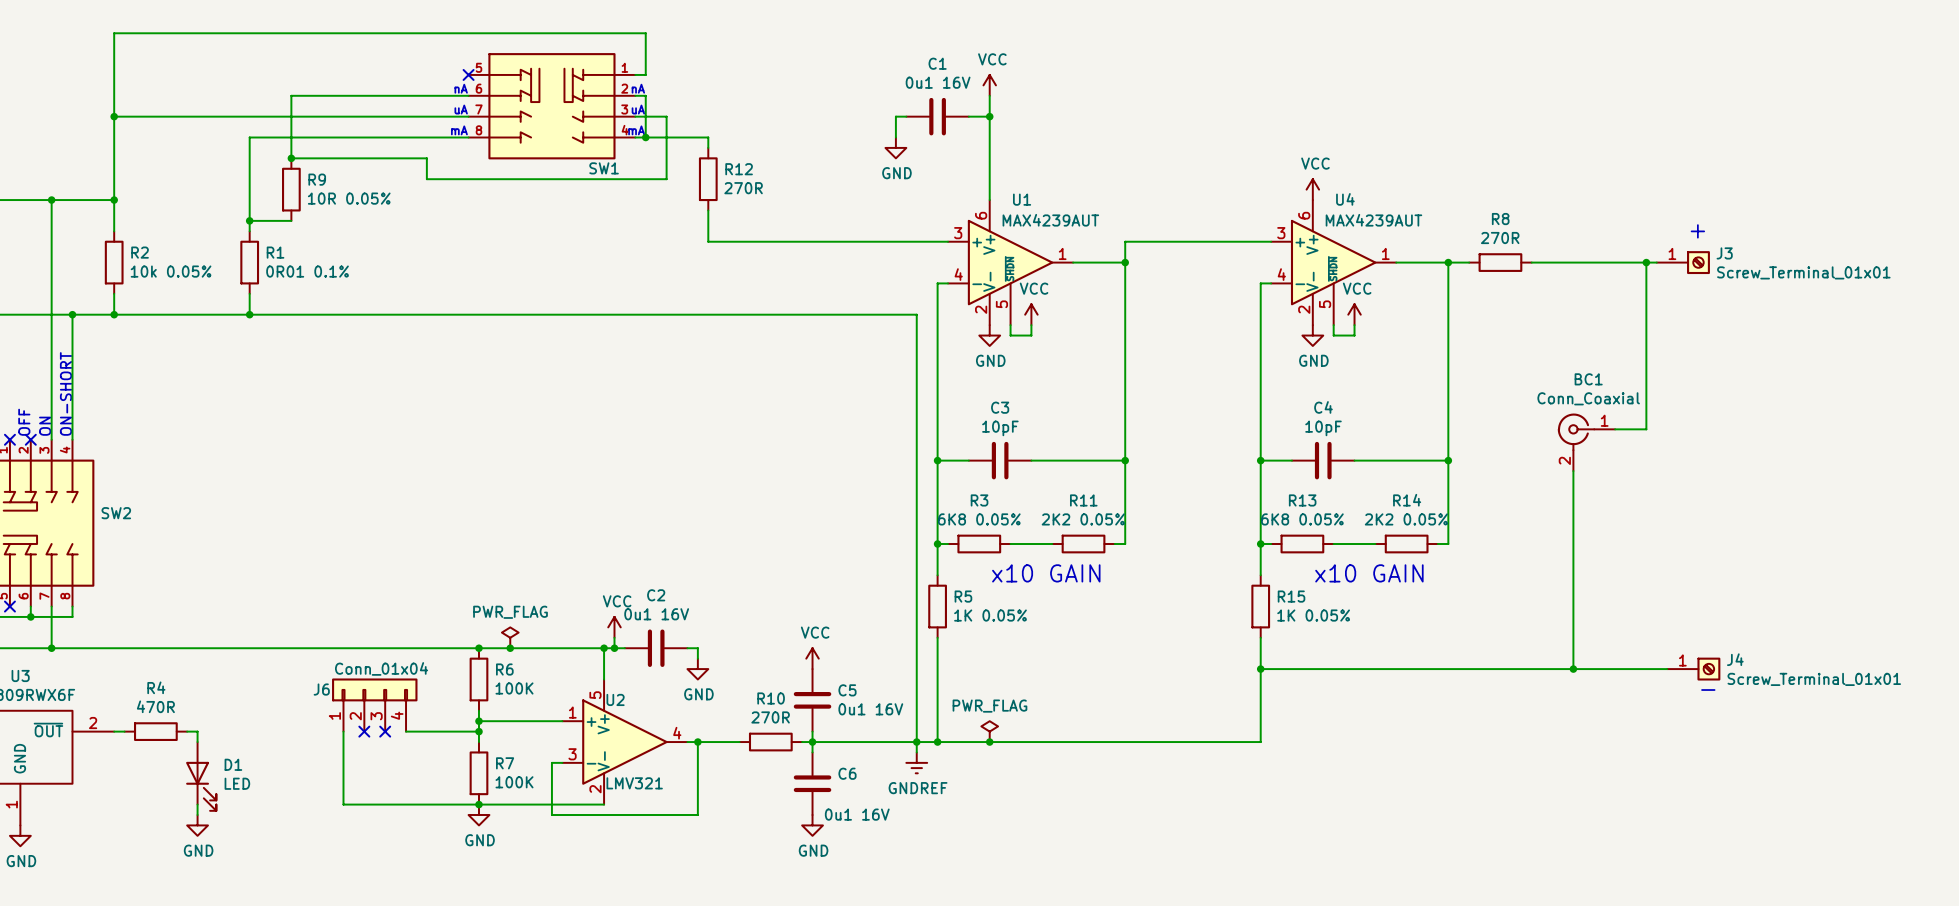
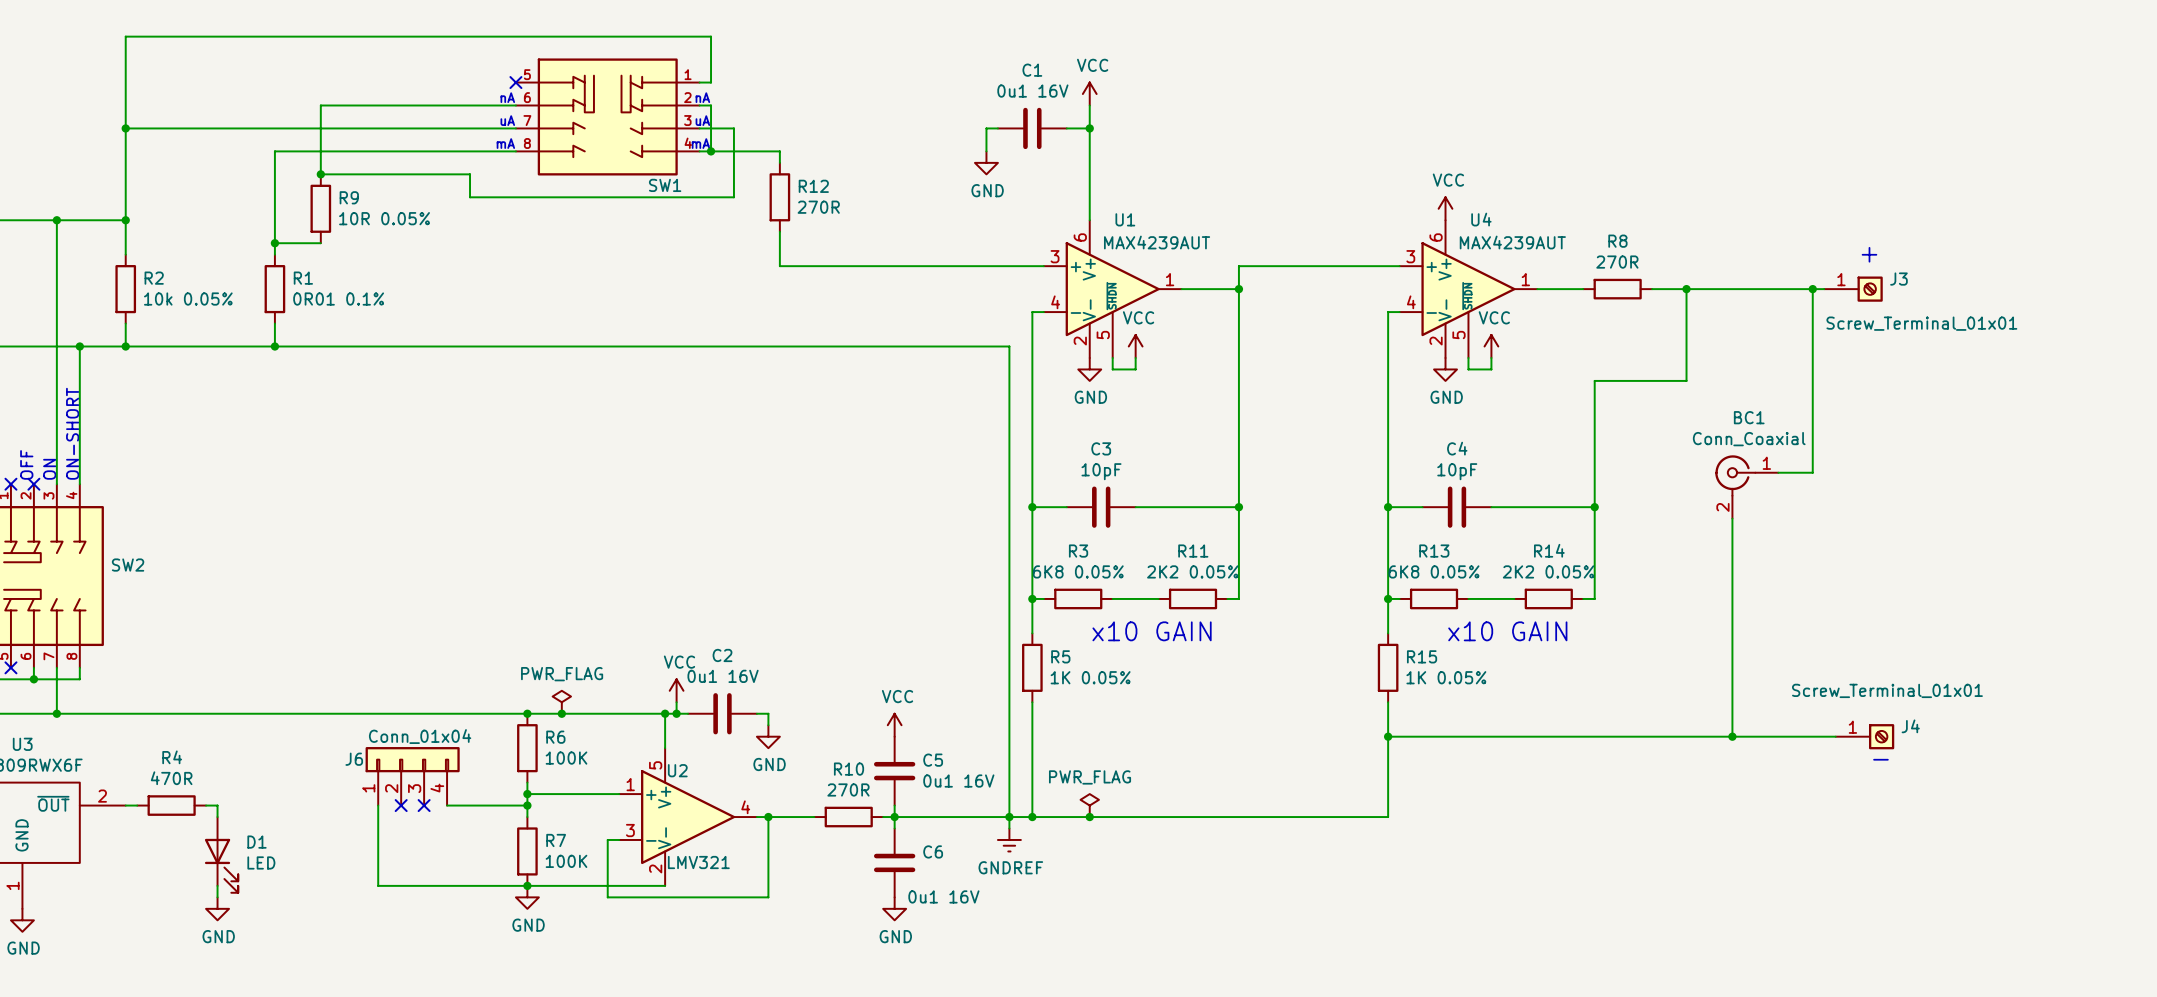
wire: (1437, 262) (1469, 262) -> none
wire: (1448, 262) (1448, 345) -> (1652, 289) (1686, 289) (1686, 380) (1594, 380)
junction: (1448, 262) -> none
R8 position: (1500, 262) -> (1617, 289)
junction: none -> (1686, 289)
J3 value position: Screw_Terminal_01x01 (1803, 272) -> Screw_Terminal_01x01 (1921, 323)
J4 value position: Screw_Terminal_01x01 (1814, 679) -> Screw_Terminal_01x01 (1887, 690)

